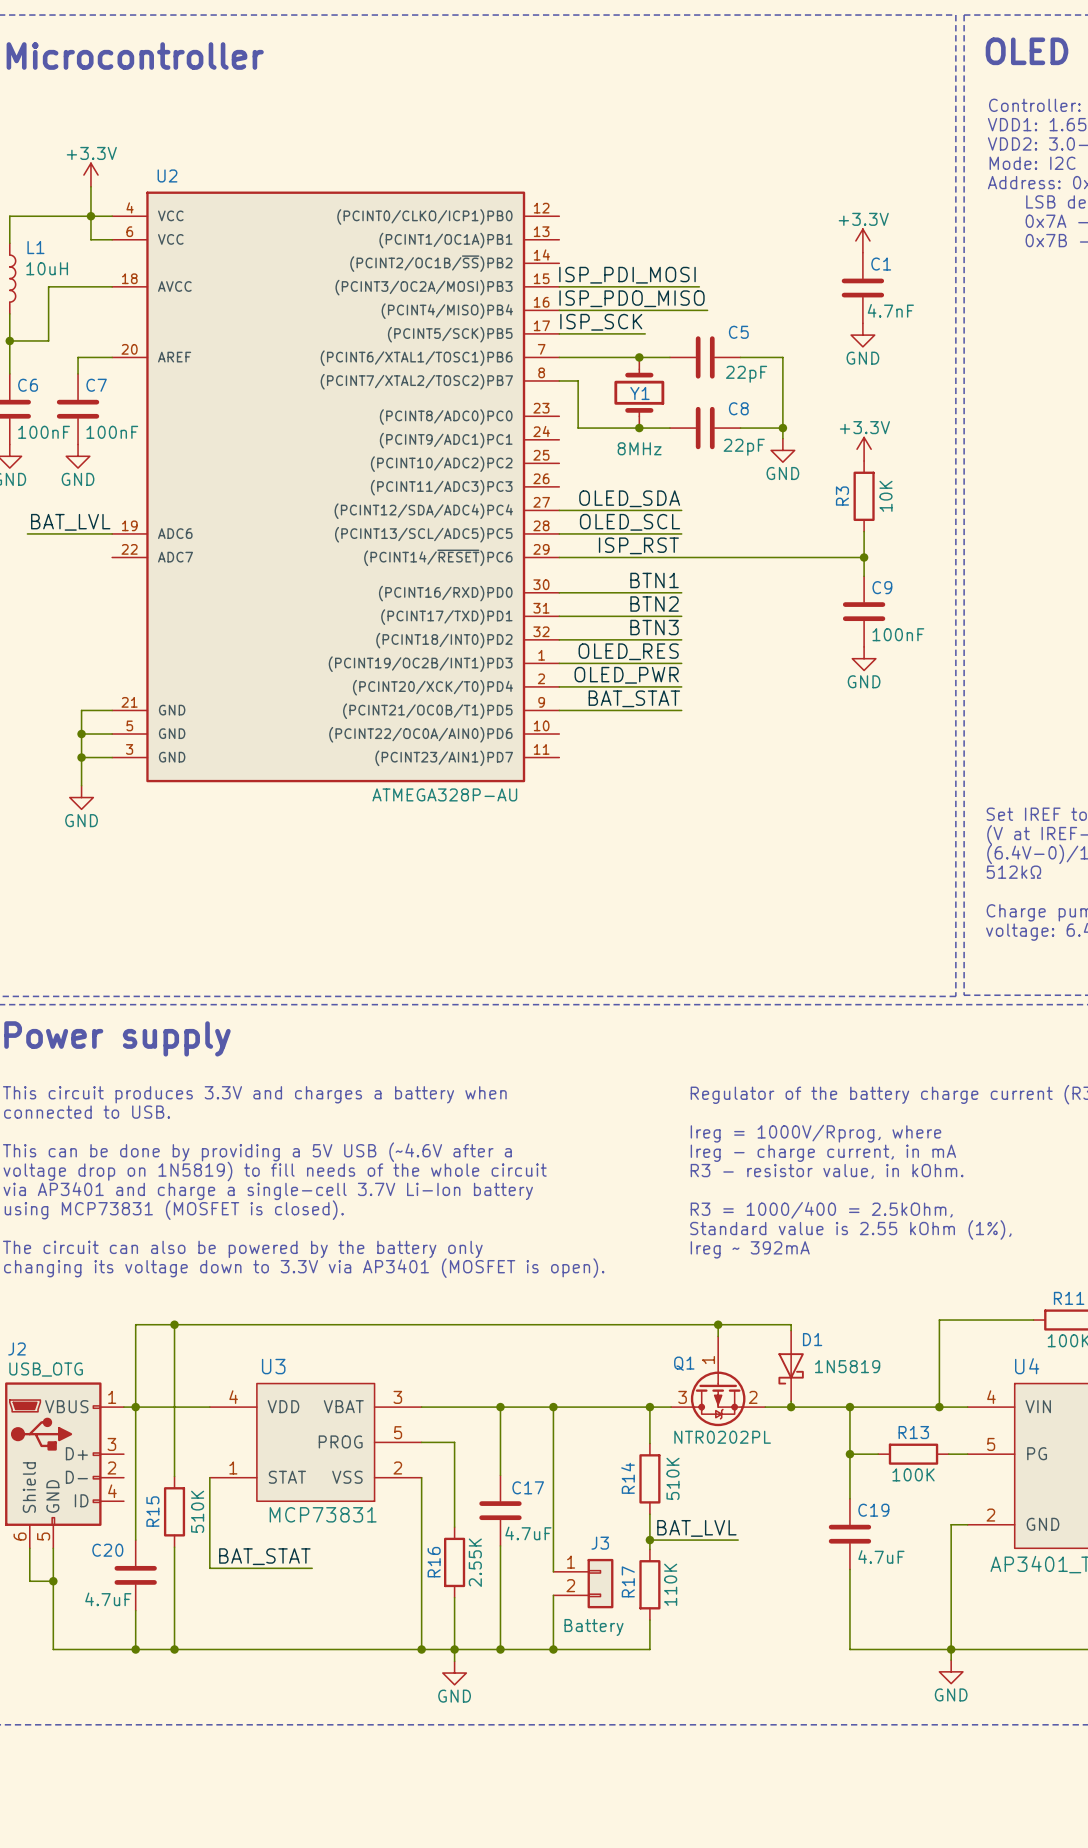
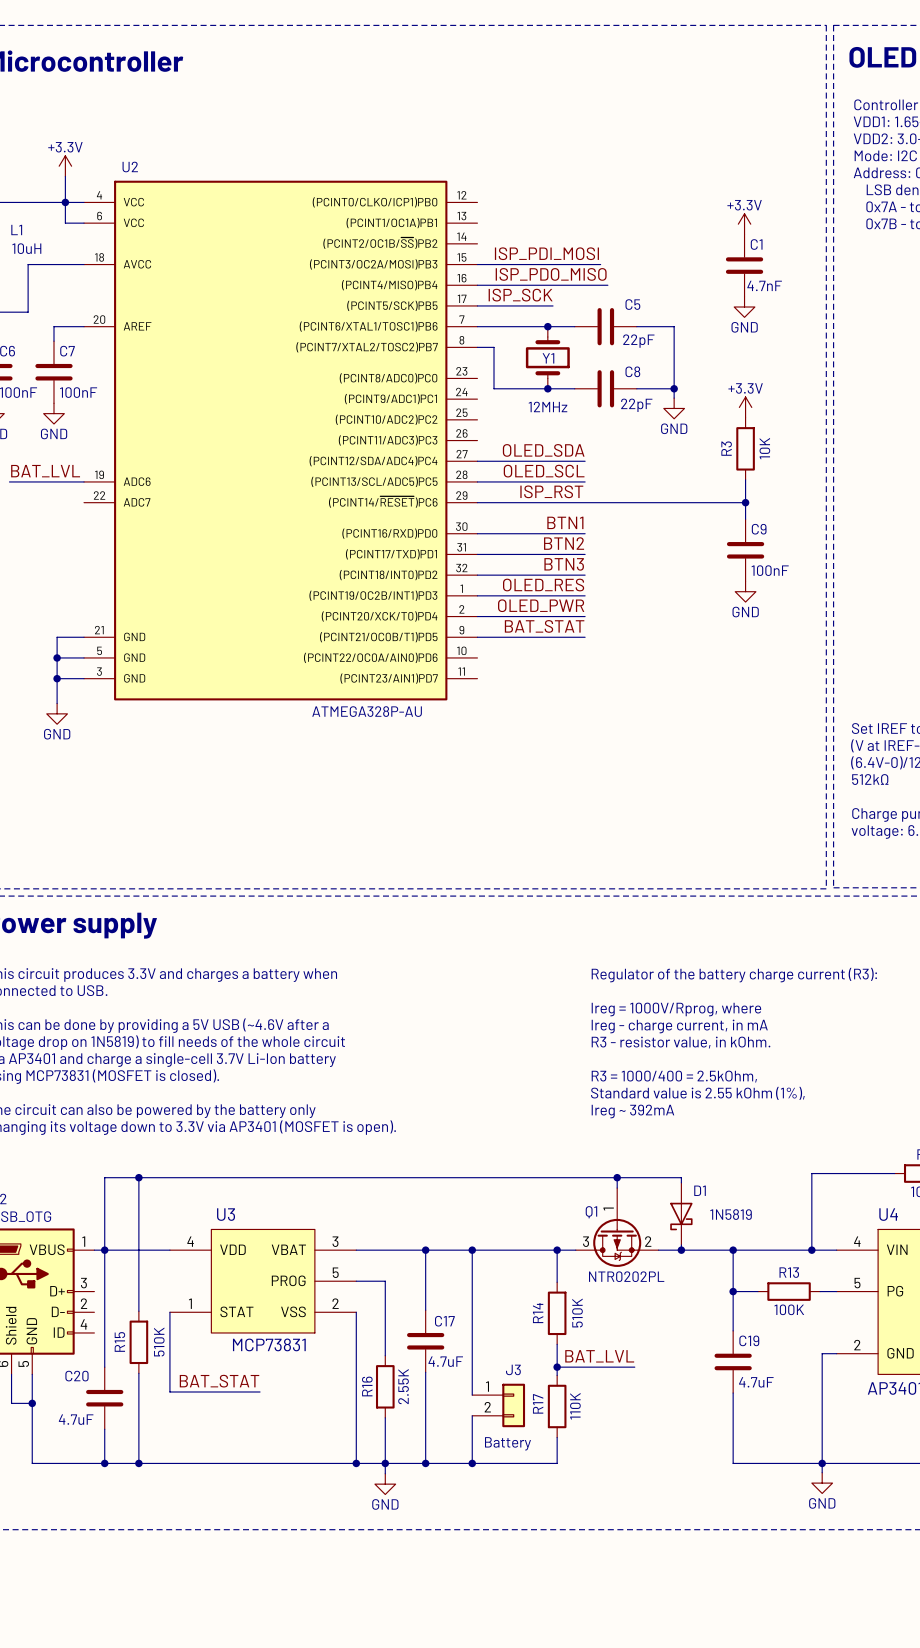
Y1 value: 8MHz (639, 448) -> 12MHz (547, 406)

